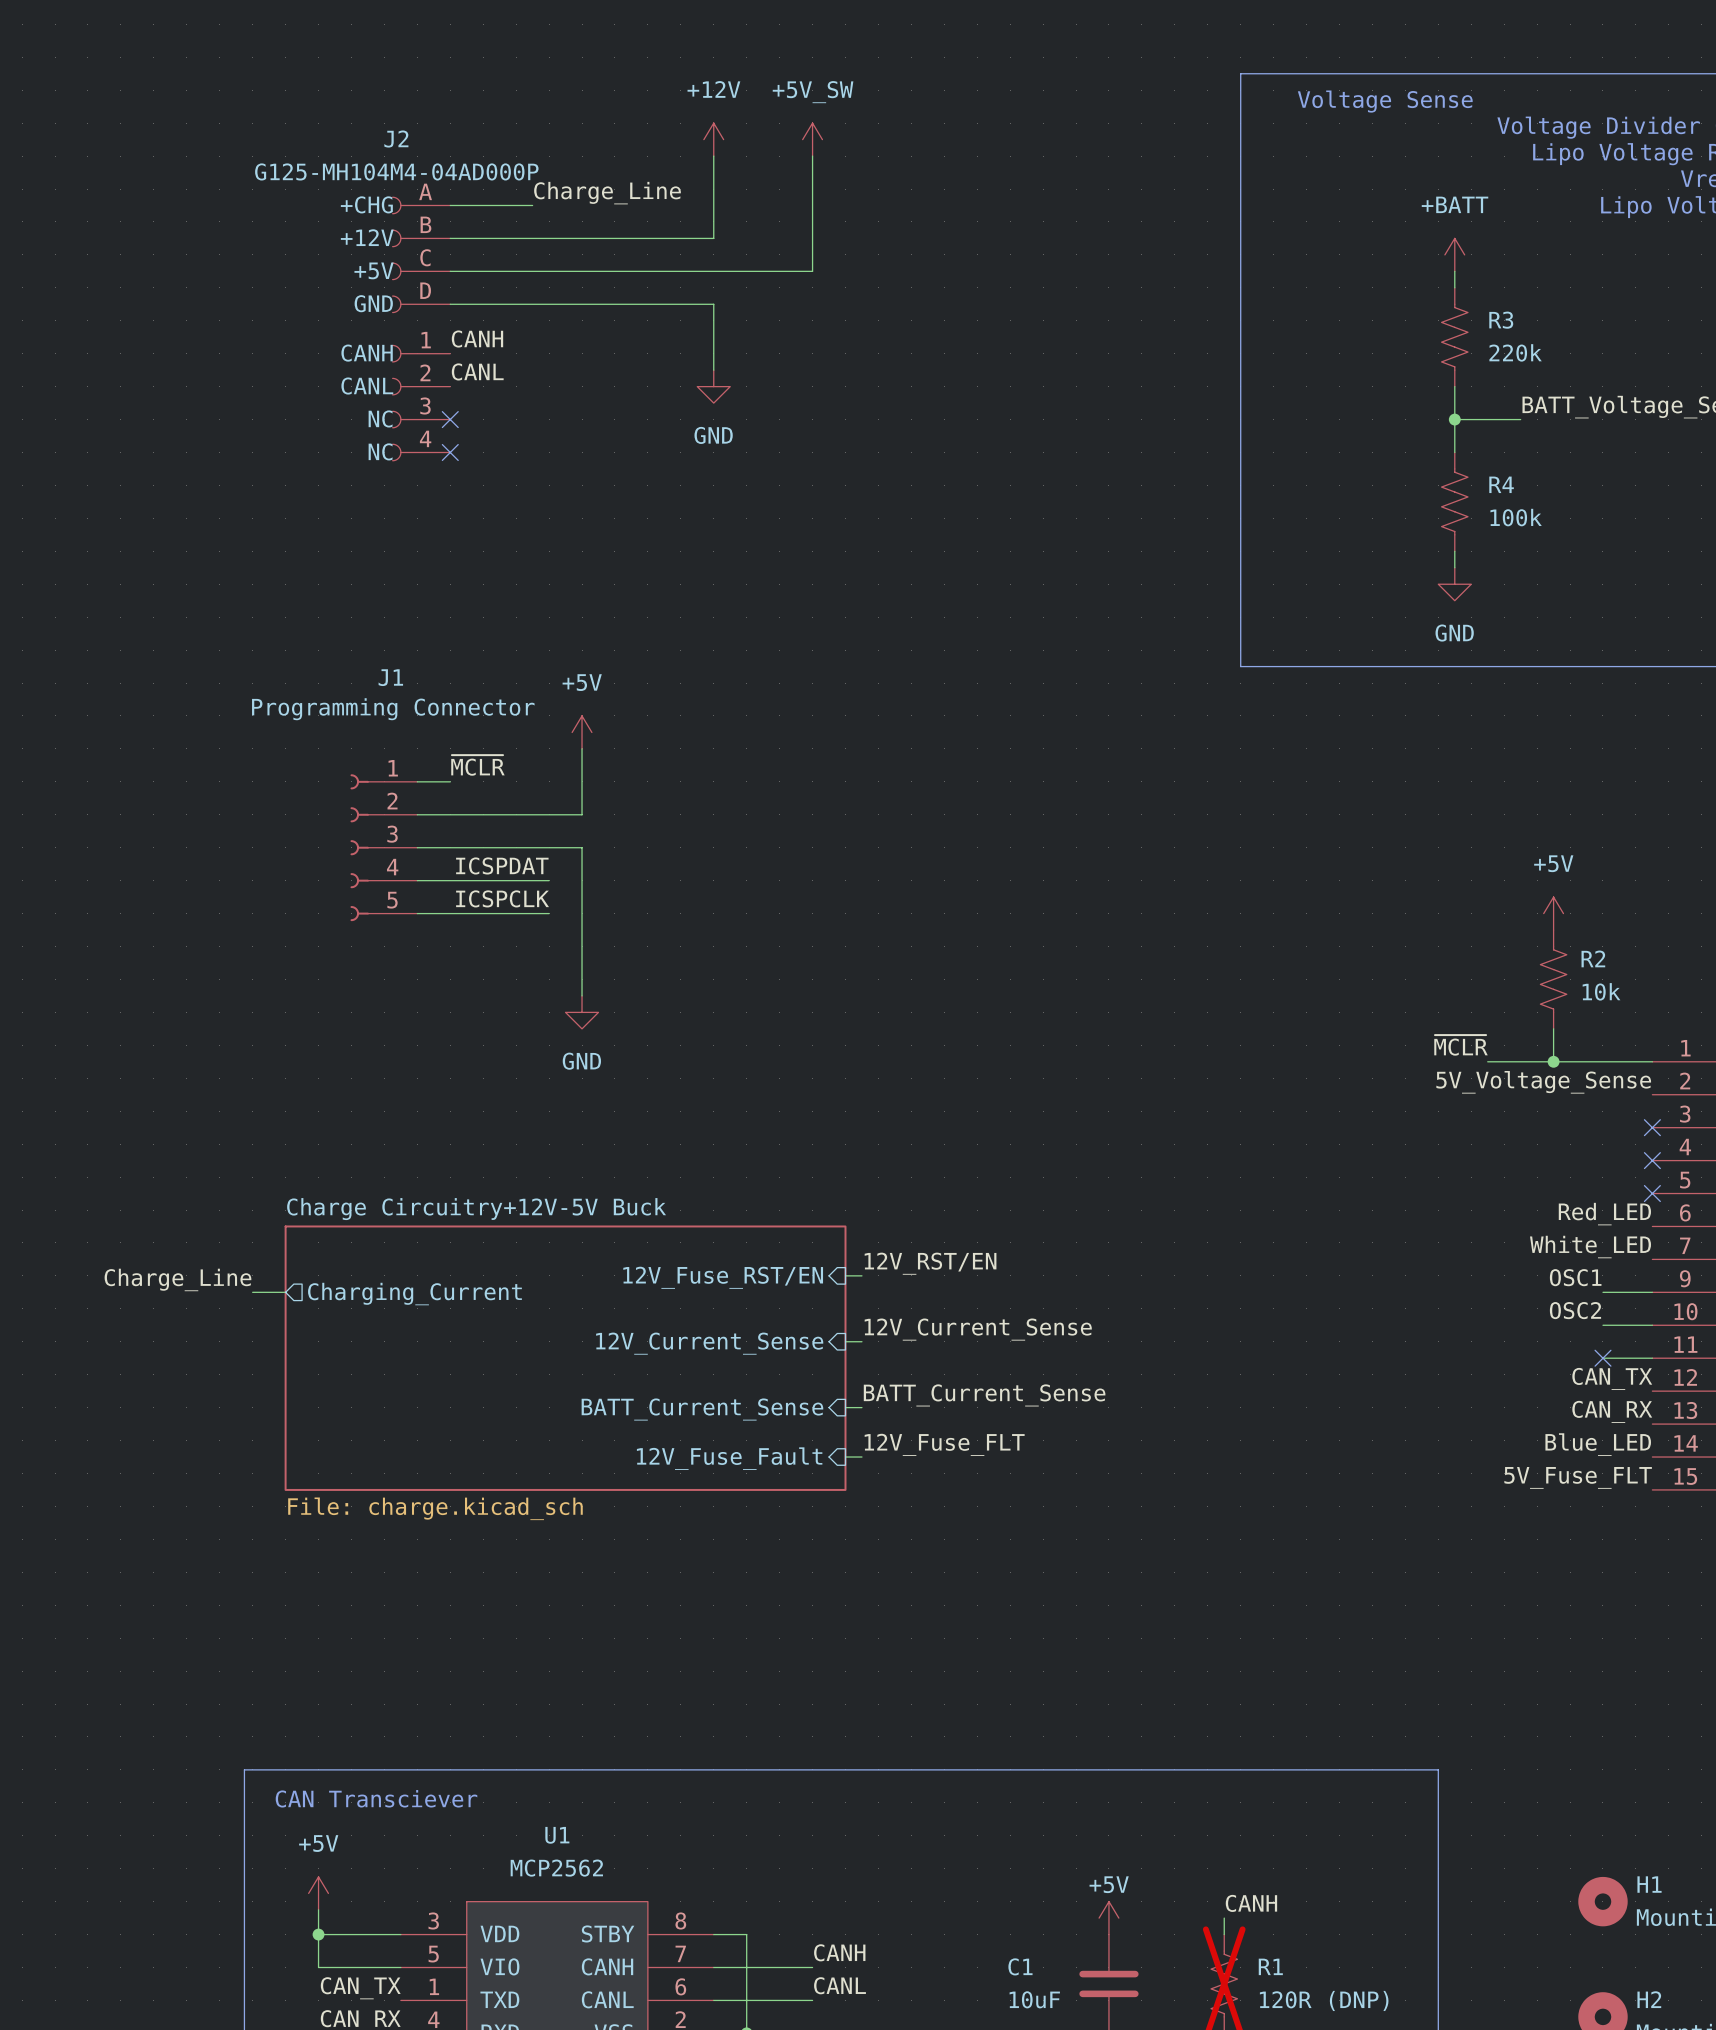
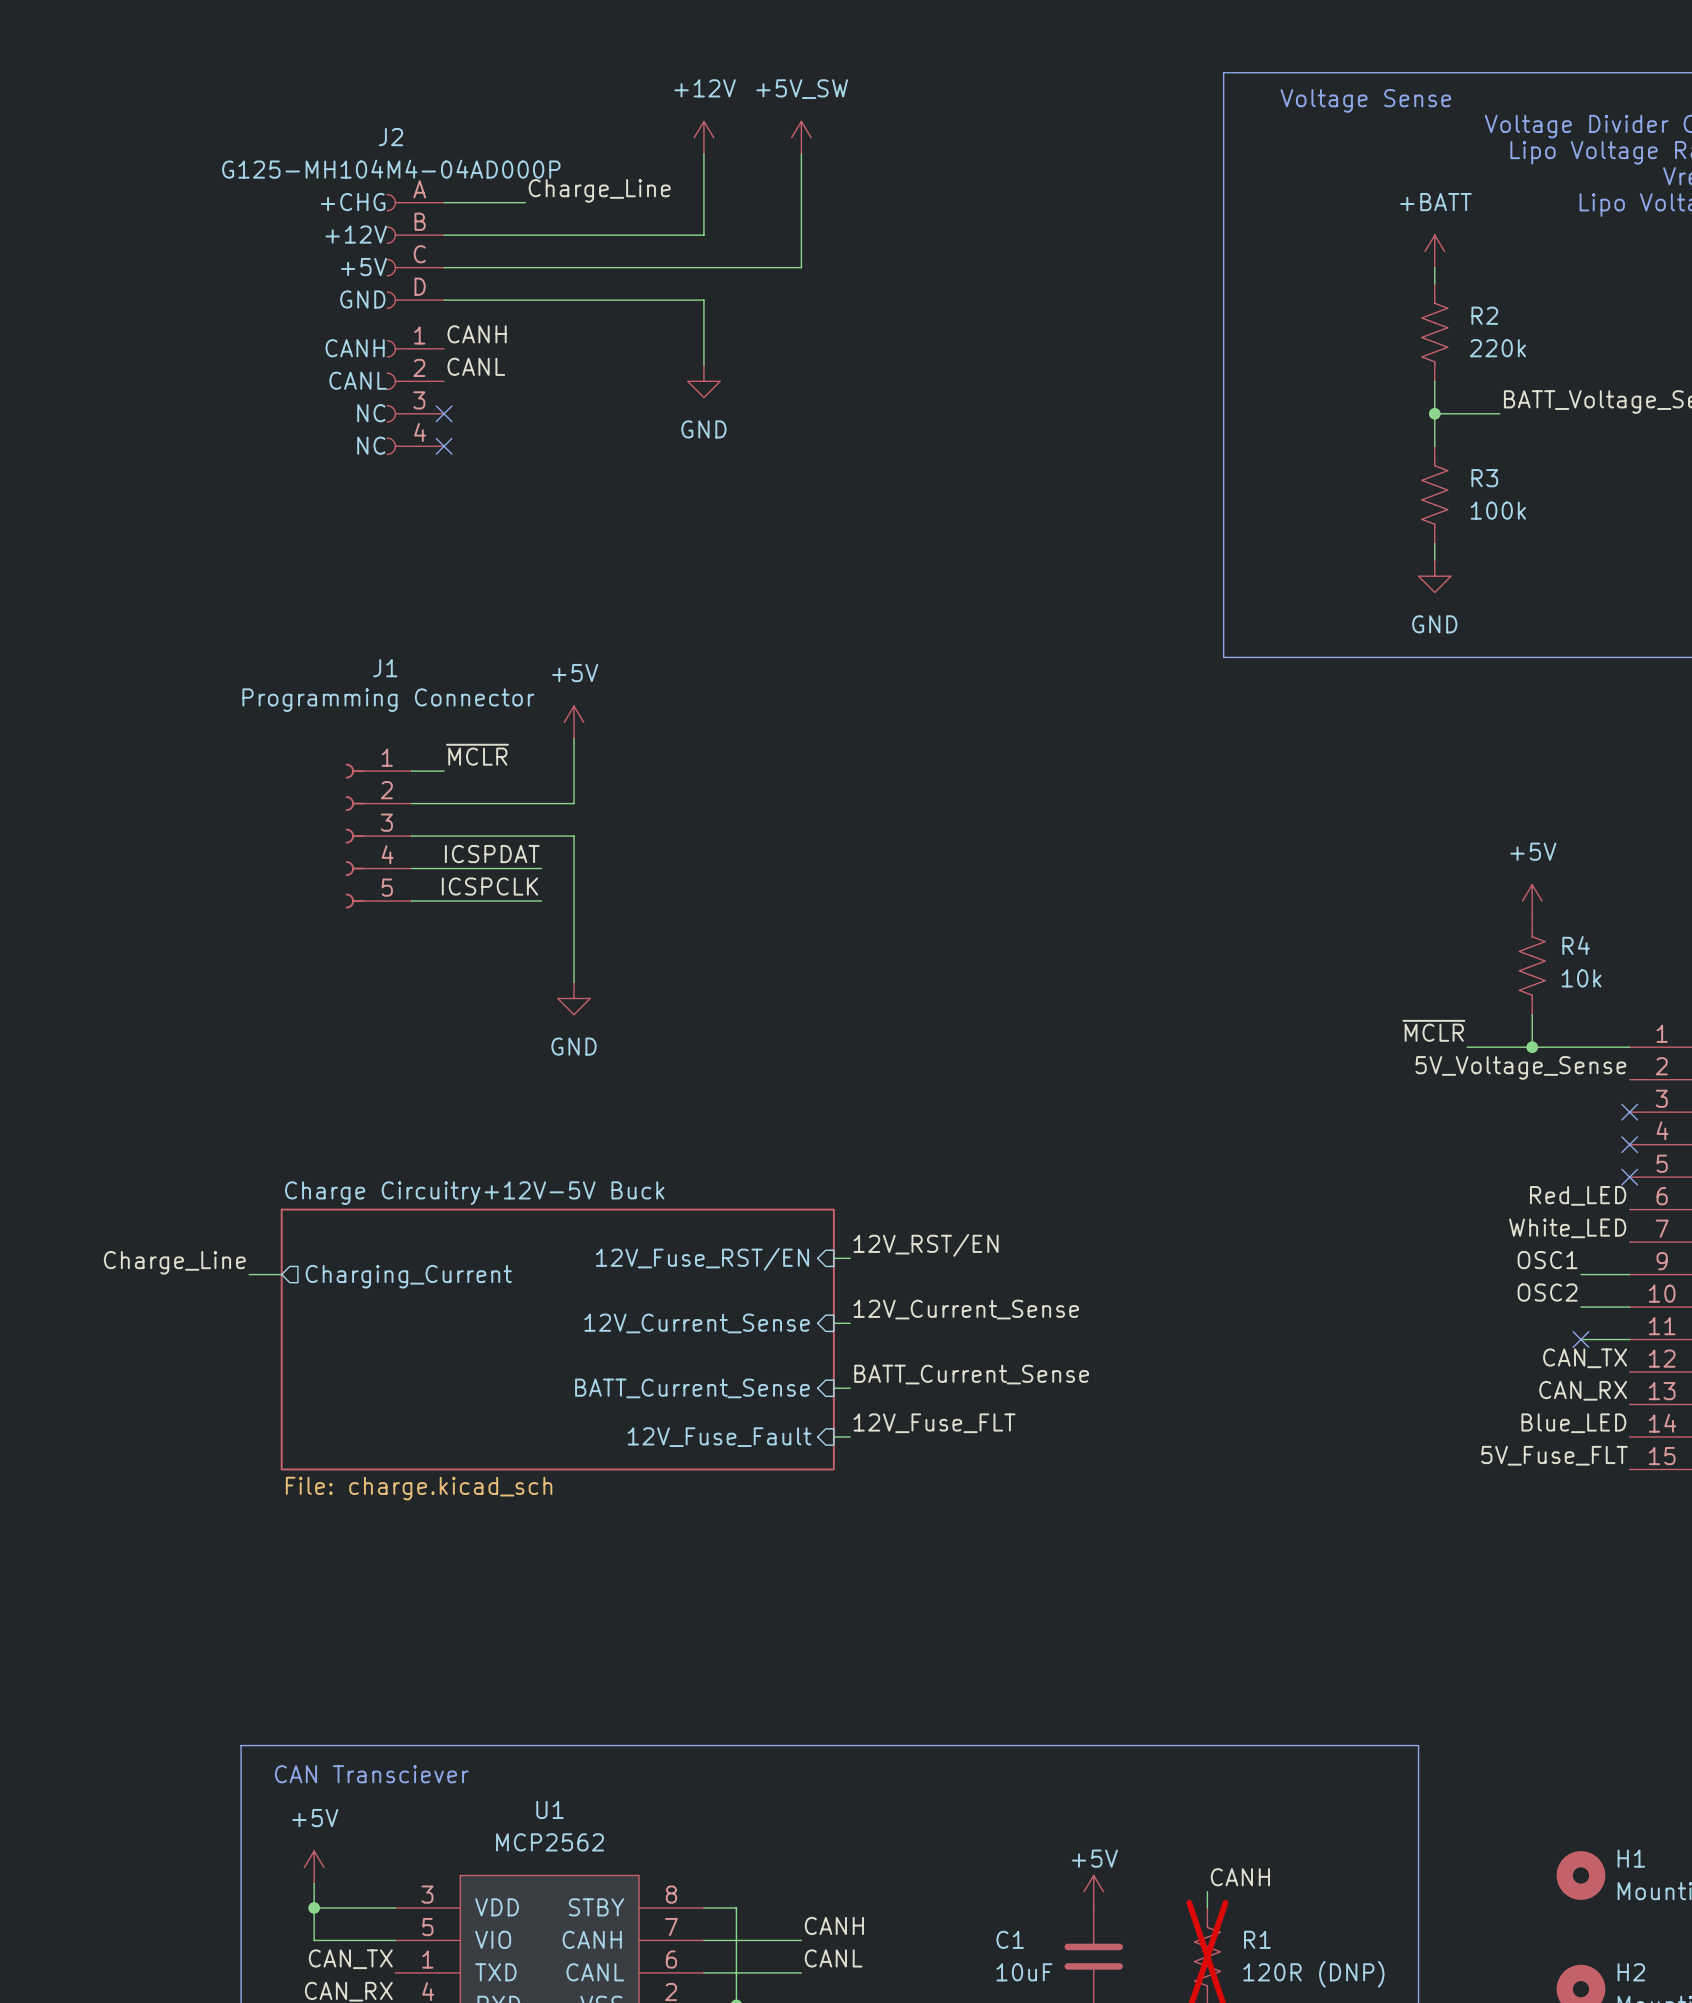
R3 name: R3 (1501, 320) -> R2 (1484, 315)
R4 name: R4 (1501, 484) -> R3 (1484, 478)
R2 name: R2 (1593, 958) -> R4 (1576, 945)

